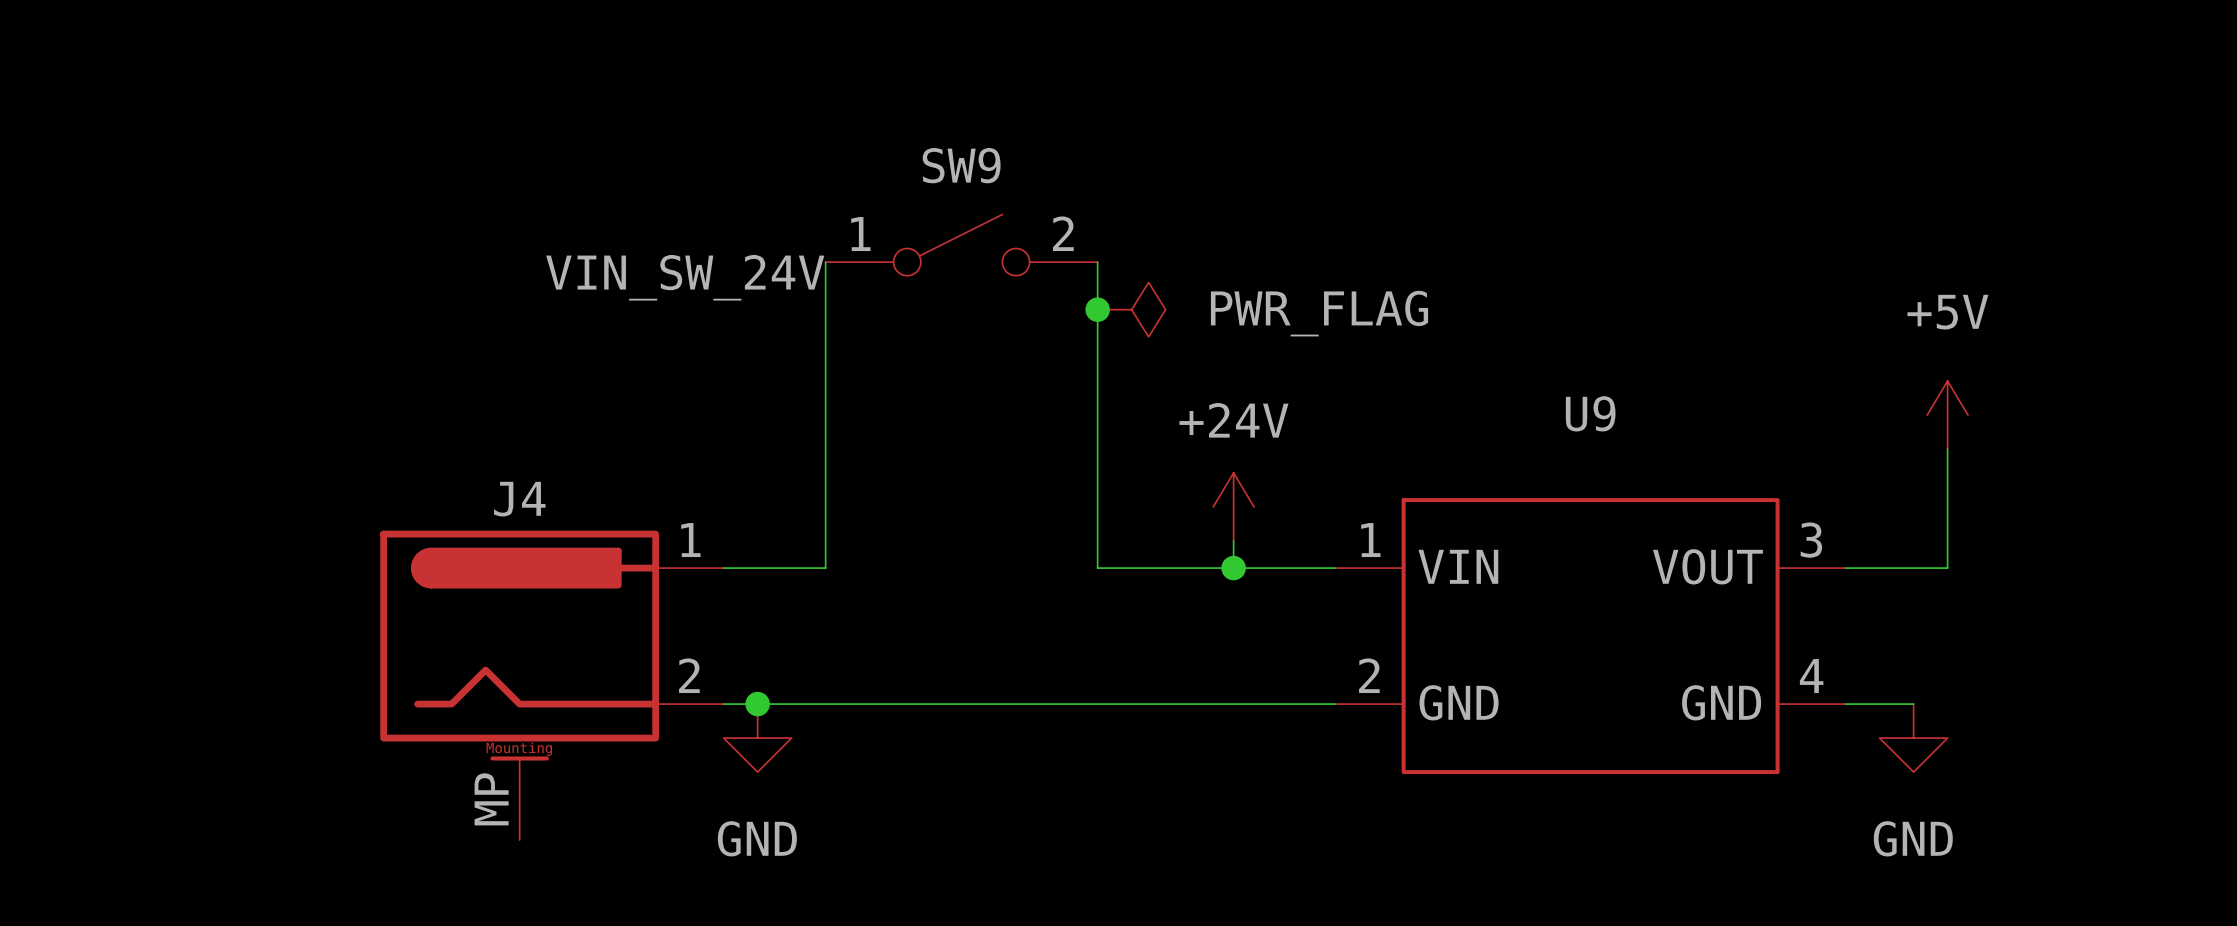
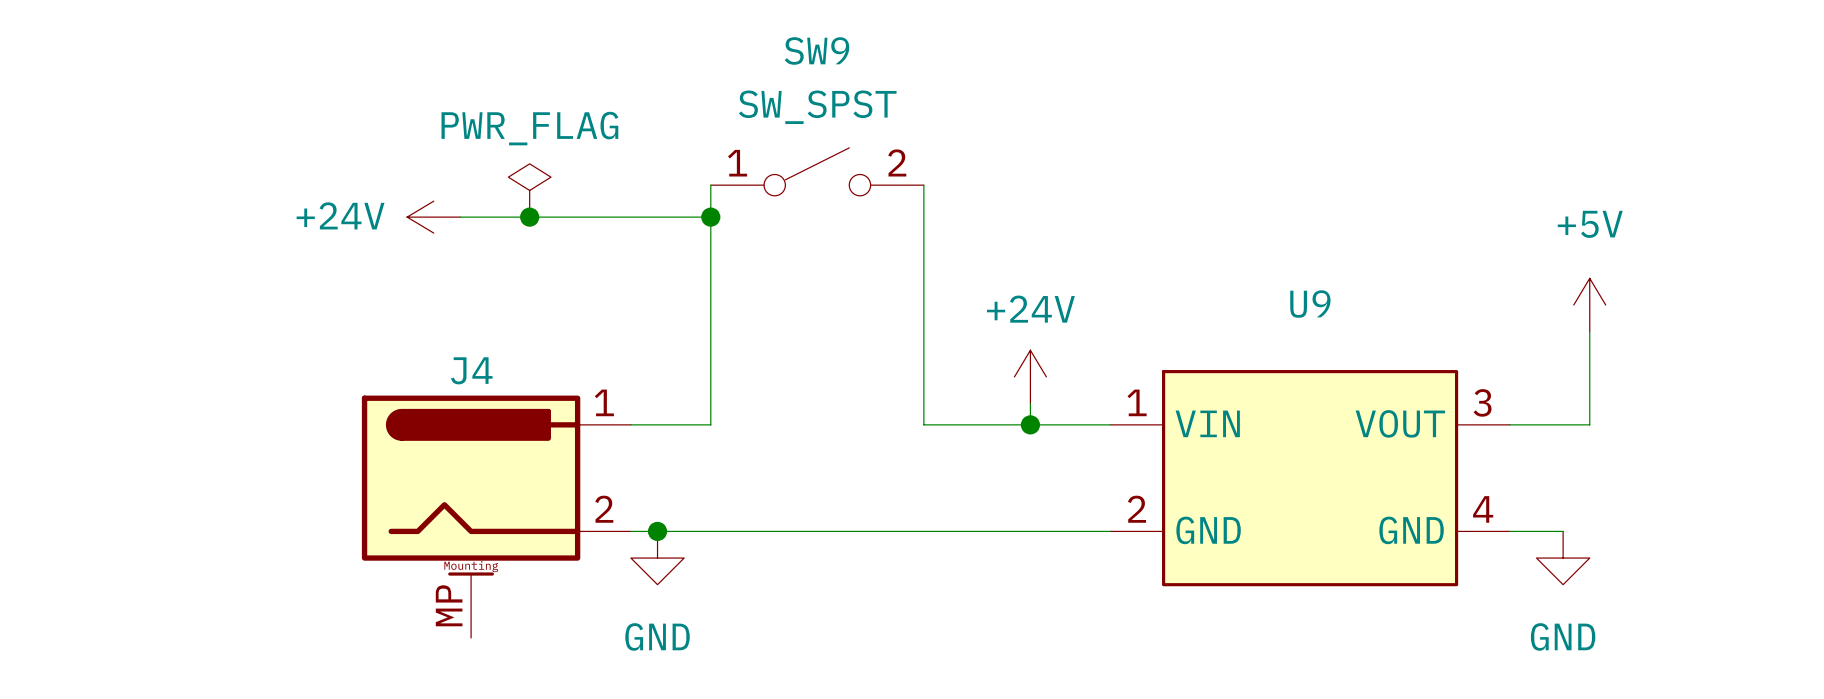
SW9 value: none -> SW_SPST (817, 107)
SW9 name position: SW9 (961, 165) -> SW9 (816, 50)
label: VIN_SW_24V (685, 277) -> none
power symbol: none -> +24V (433, 217)
wire: none -> (460, 217) (710, 217)
junction: none -> (529, 217)
junction: none -> (710, 217)
junction: (1097, 309) -> none
power symbol rotation: 0° (1131, 309) -> 90° counterclockwise (529, 190)
power symbol position: PWR_FLAG (1131, 309) -> PWR_FLAG (529, 190)
power symbol text position: PWR_FLAG (1319, 313) -> PWR_FLAG (529, 128)

